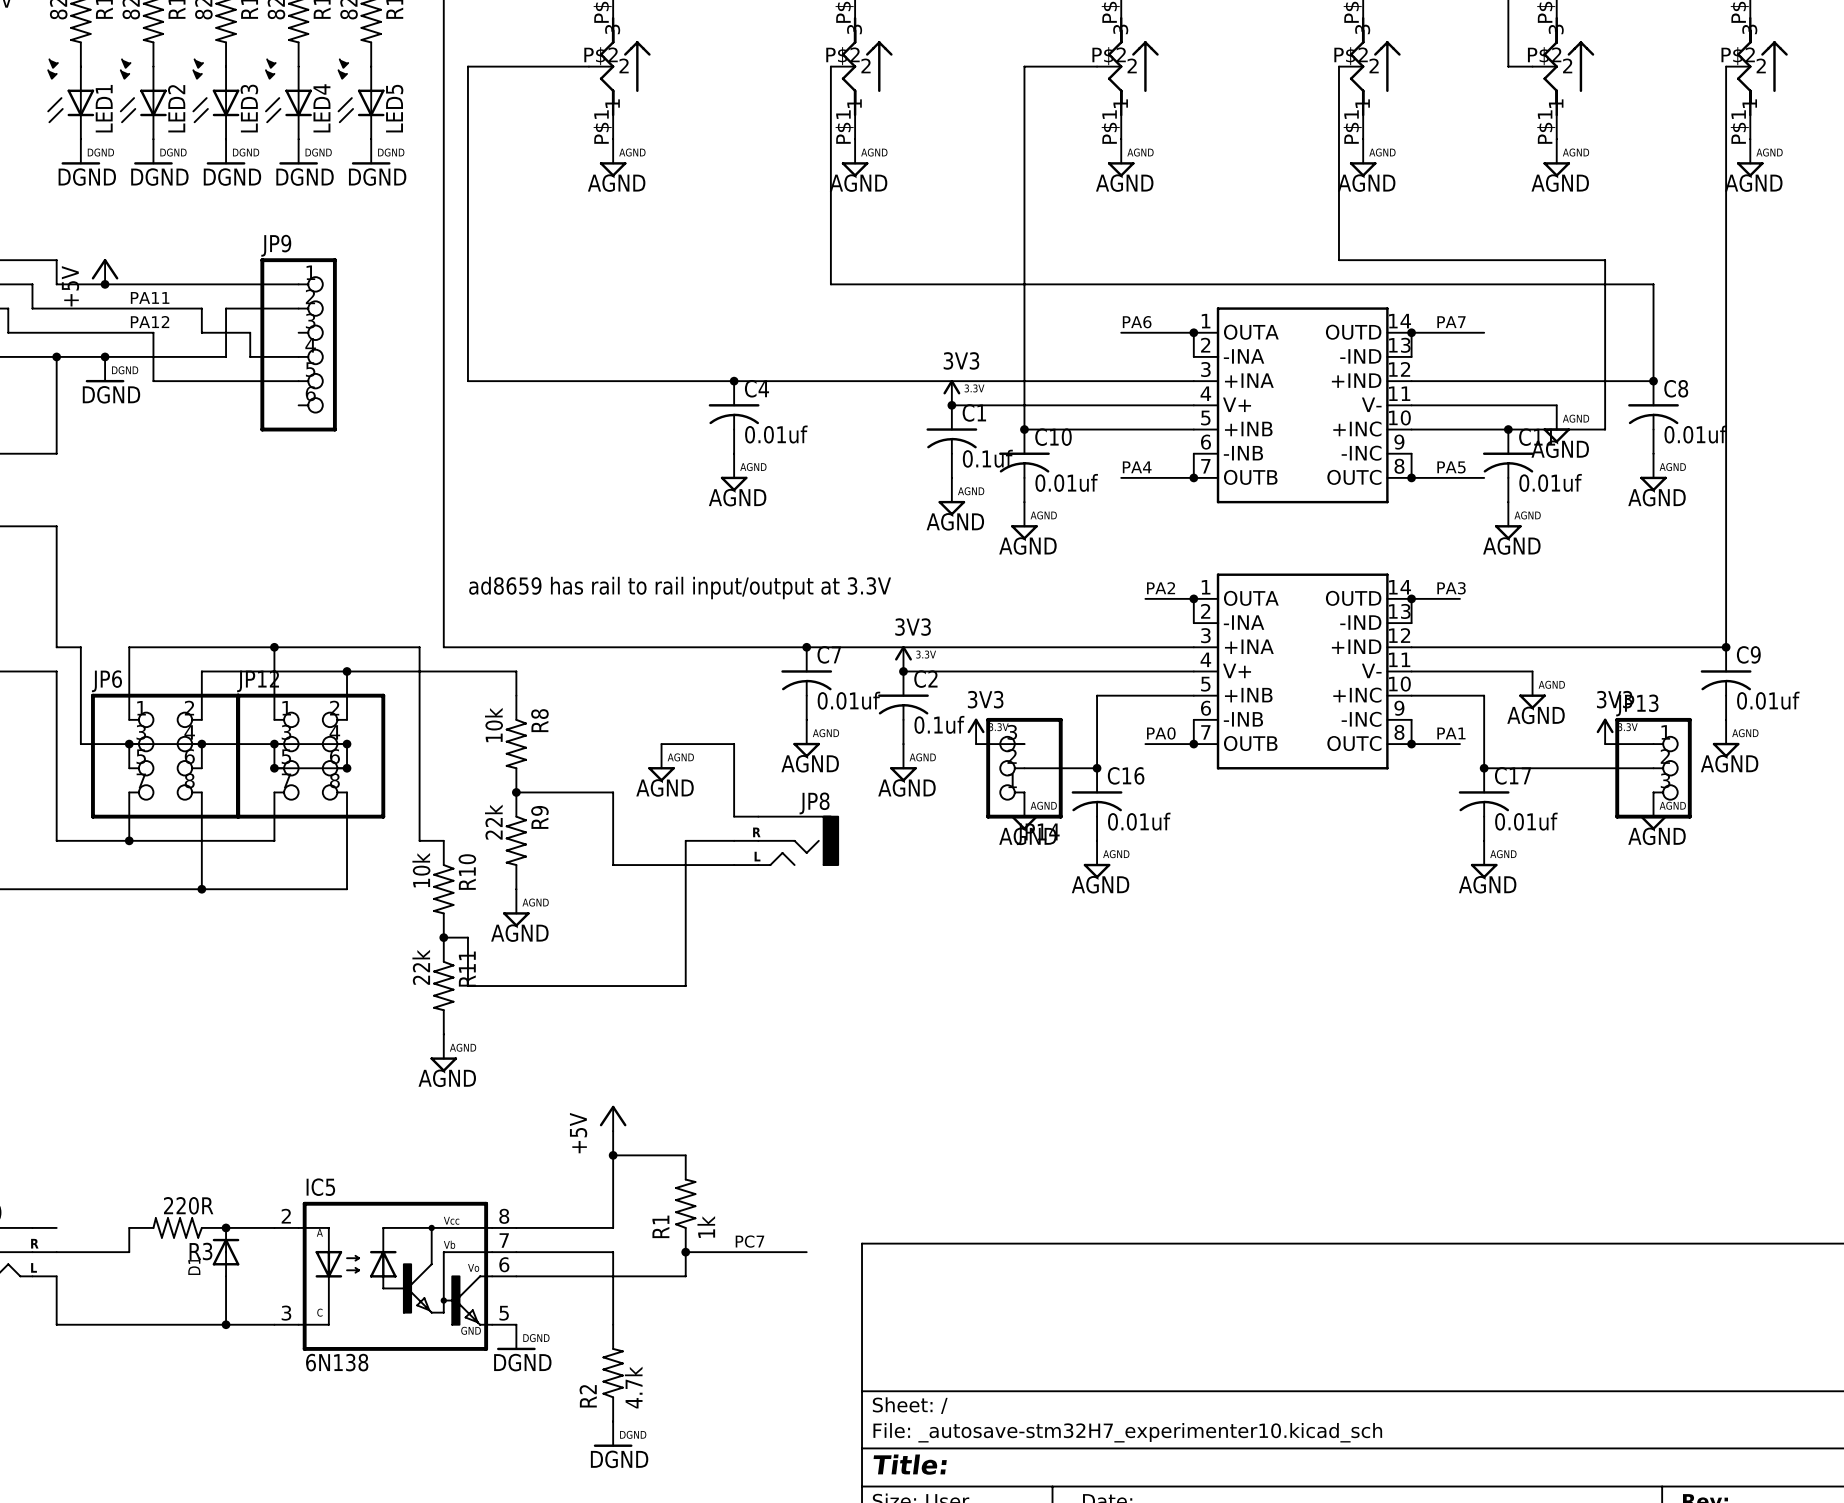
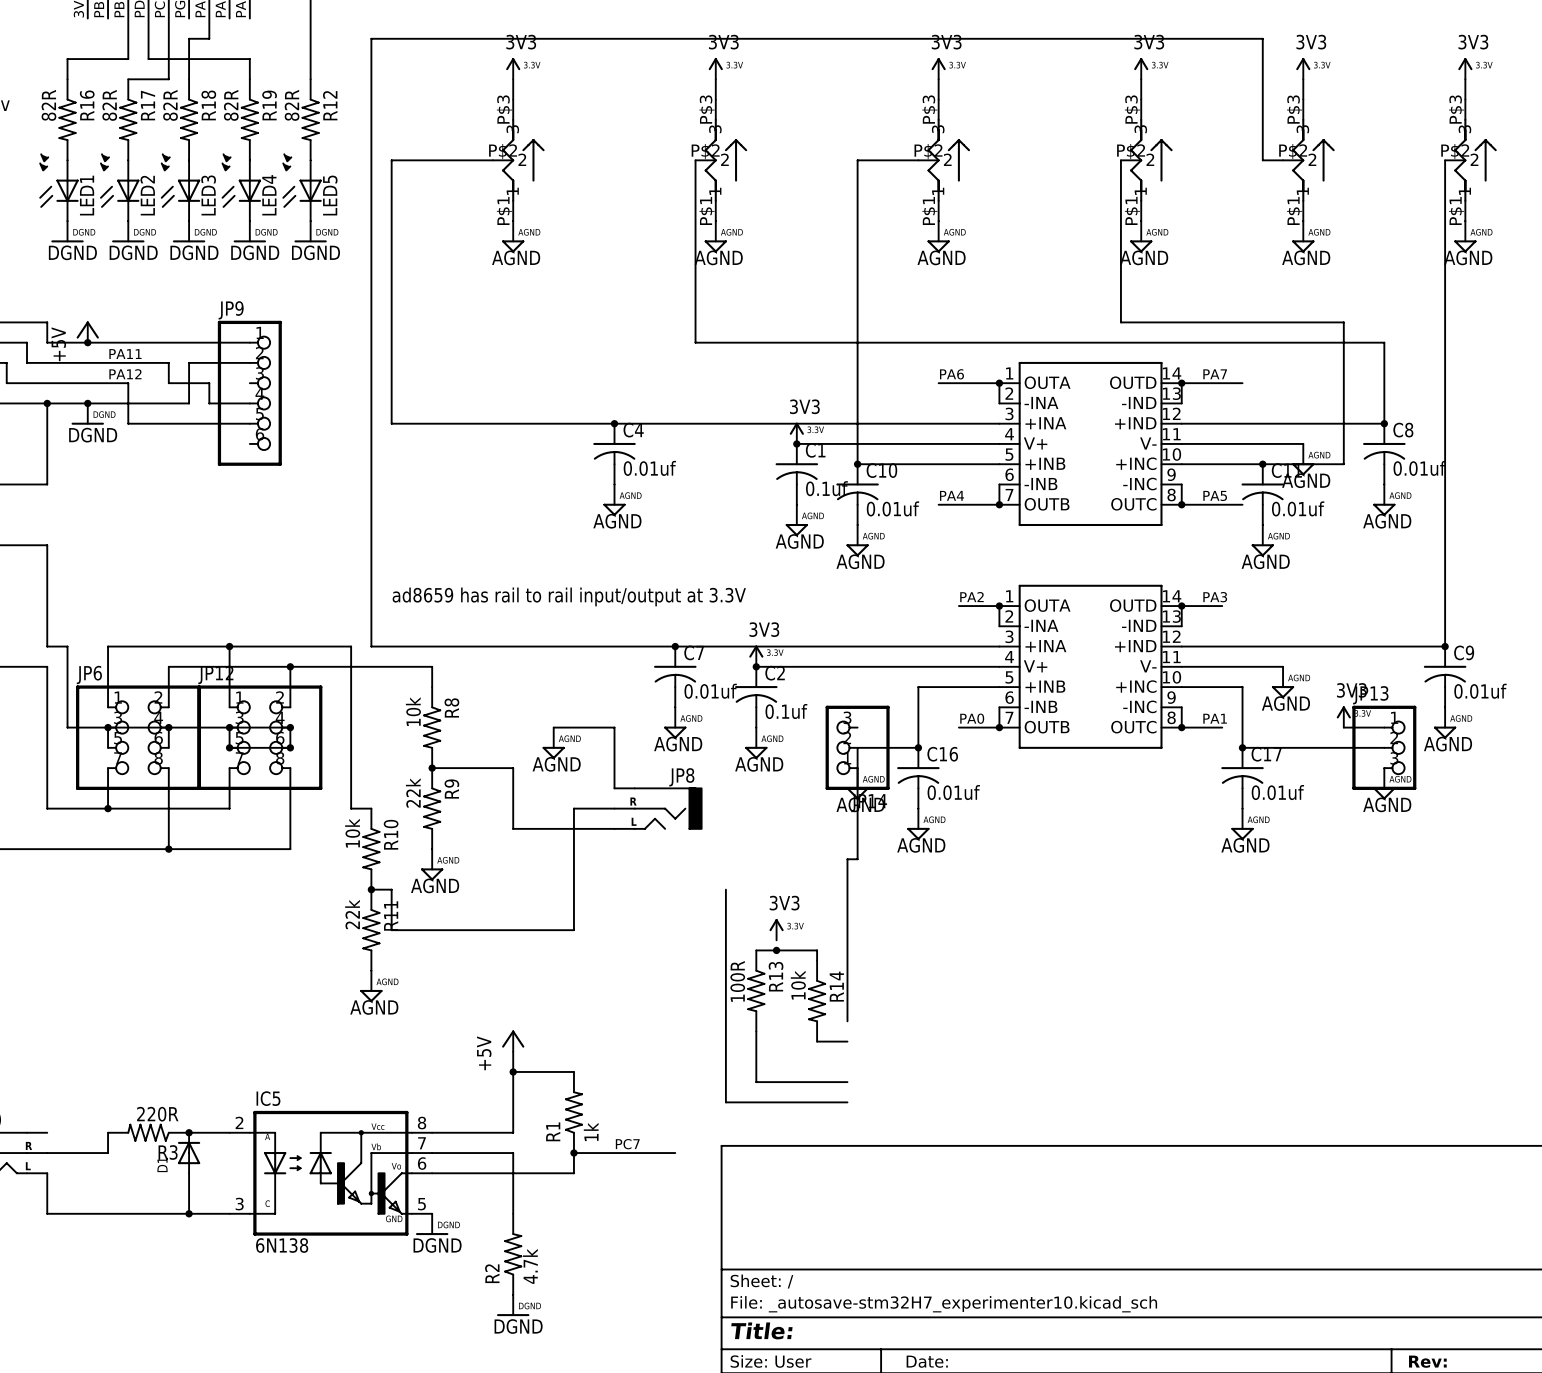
power symbol: 3V3 (976, 731) -> none
wire: (976, 744) (1024, 744) -> none
wire: none -> (857, 747) (857, 859) (847, 859) (847, 1021)
wire: none -> (725, 889) (725, 1102) (847, 1102)
power symbol: none -> 3V3 (776, 929)
wire: none -> (756, 950) (817, 950) (817, 960)
junction: none -> (776, 950)
R13: none -> 100R (756, 990)
R14: none -> 10k (817, 1001)
wire: none -> (756, 1031) (756, 1082) (847, 1082)
wire: none -> (817, 1041) (847, 1041)

